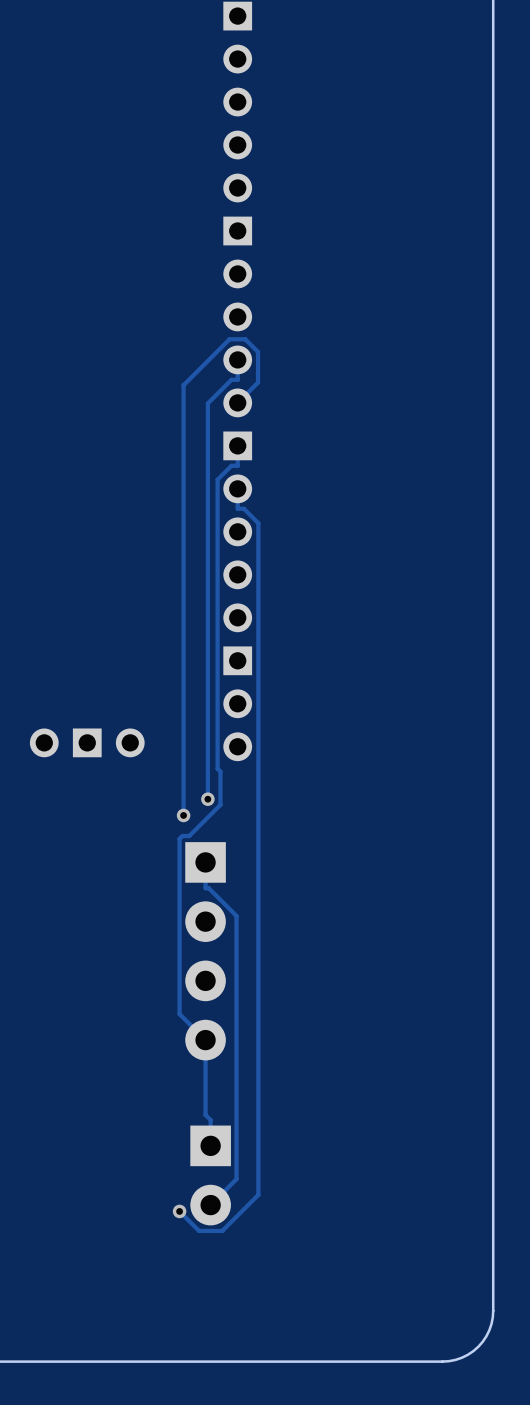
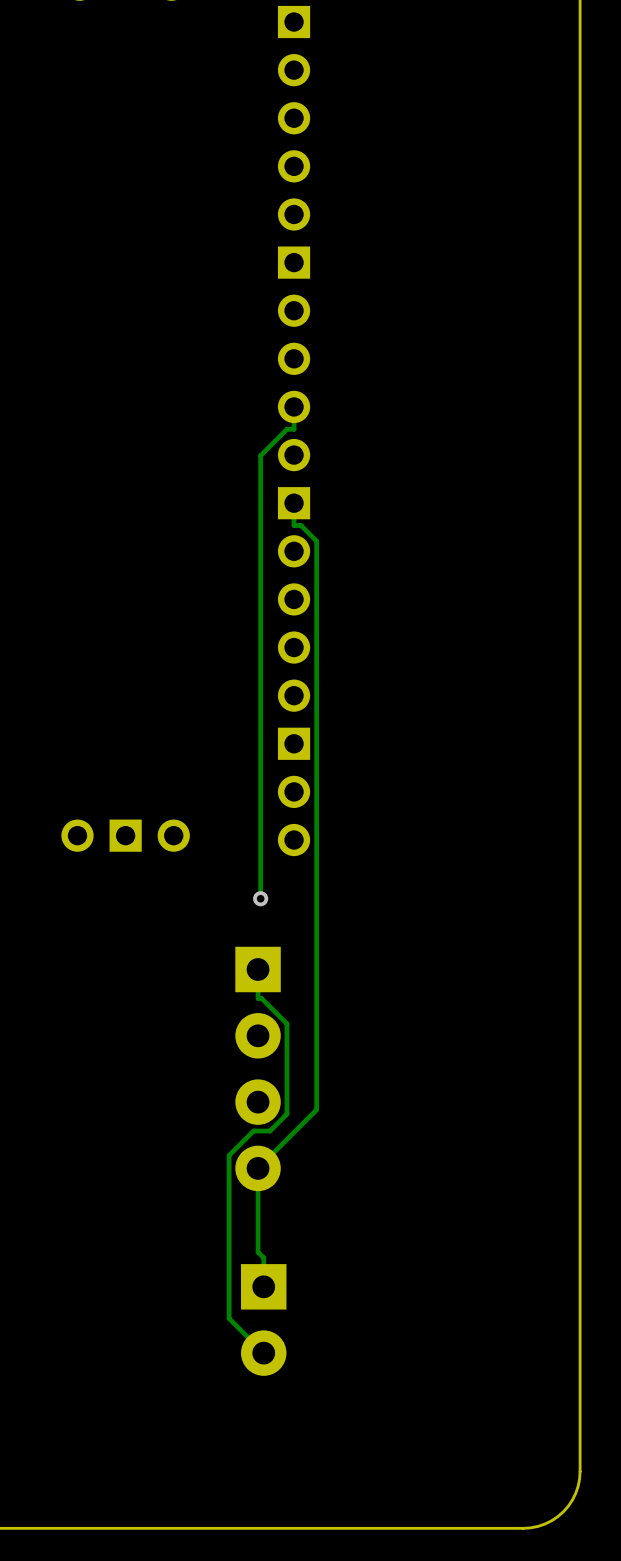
track: (237, 402) (258, 382) (258, 352) (245, 339) (229, 339) (183, 385) (183, 815) -> none
track: (237, 465) (231, 465) (217, 479) (217, 768) (220, 771) (220, 804) (189, 836) (182, 836) (179, 838) (179, 1014) (205, 1040) -> (294, 525) (301, 525) (316, 541) (316, 1109) (258, 1168)
track: (237, 488) (237, 508) (243, 508) (258, 523) (258, 1194) (222, 1230) (199, 1230) (179, 1211) -> none
via: (183, 815) -> none
track: (231, 910) (236, 916) (236, 1179) (210, 1205) -> (286, 1023) (286, 1114) (270, 1131) (253, 1131) (229, 1155) (229, 1318) (263, 1353)
via: (179, 1211) -> none

